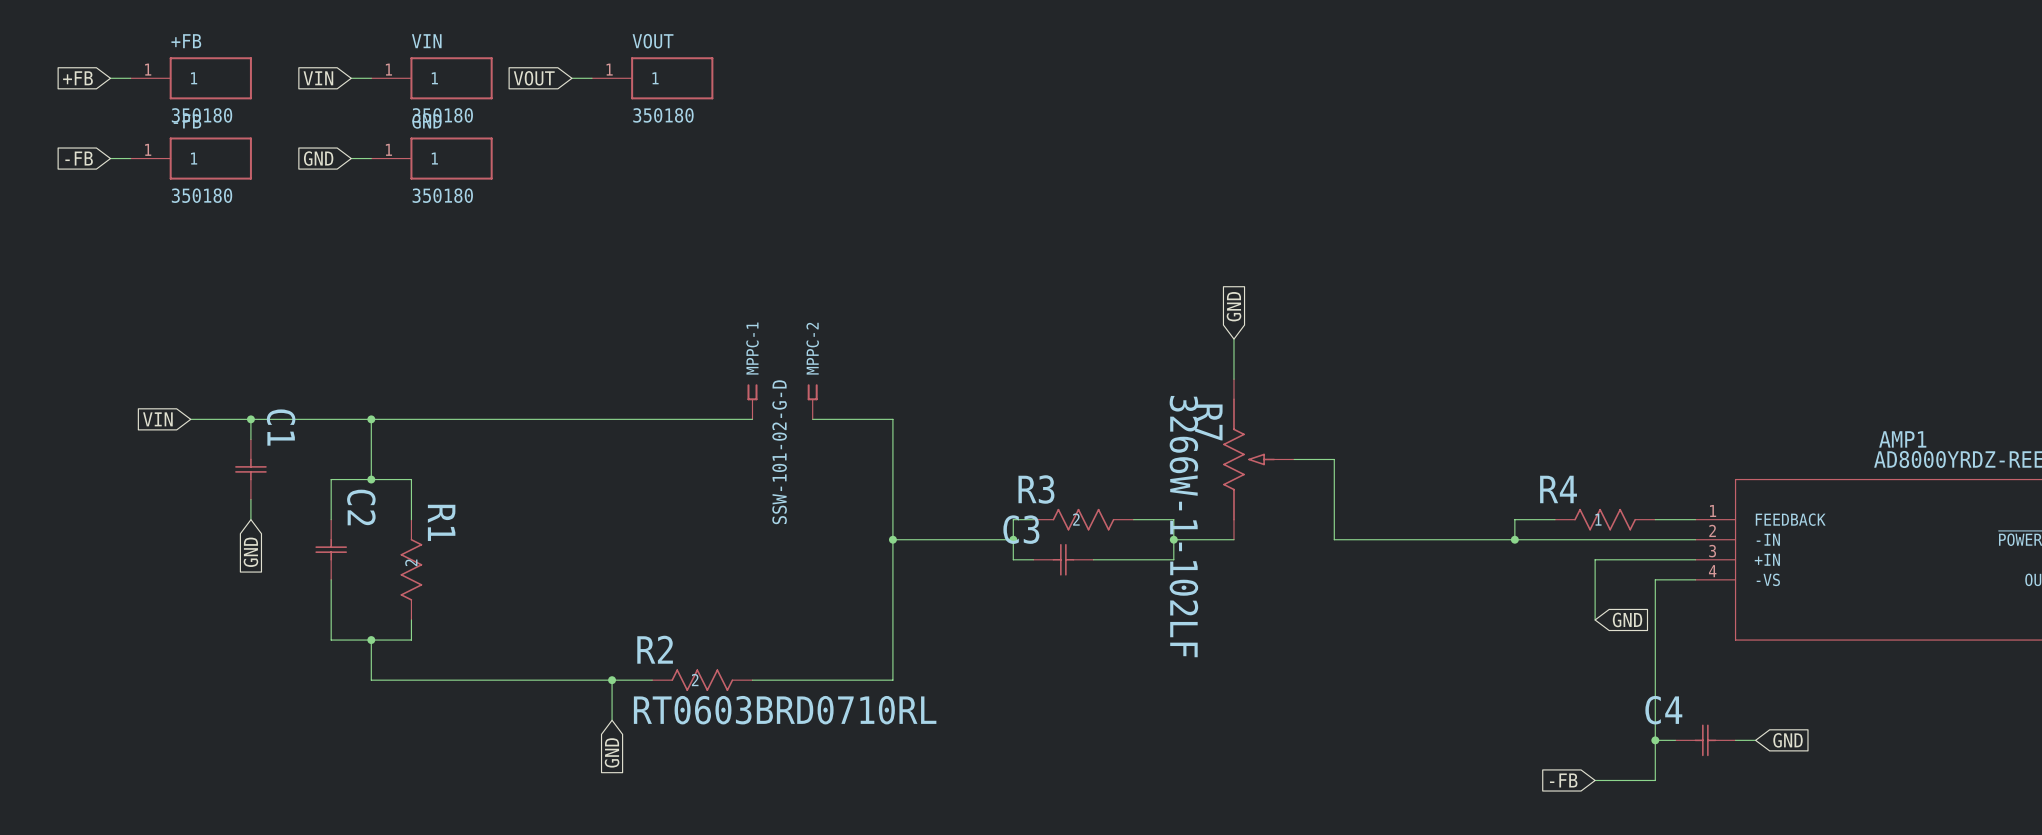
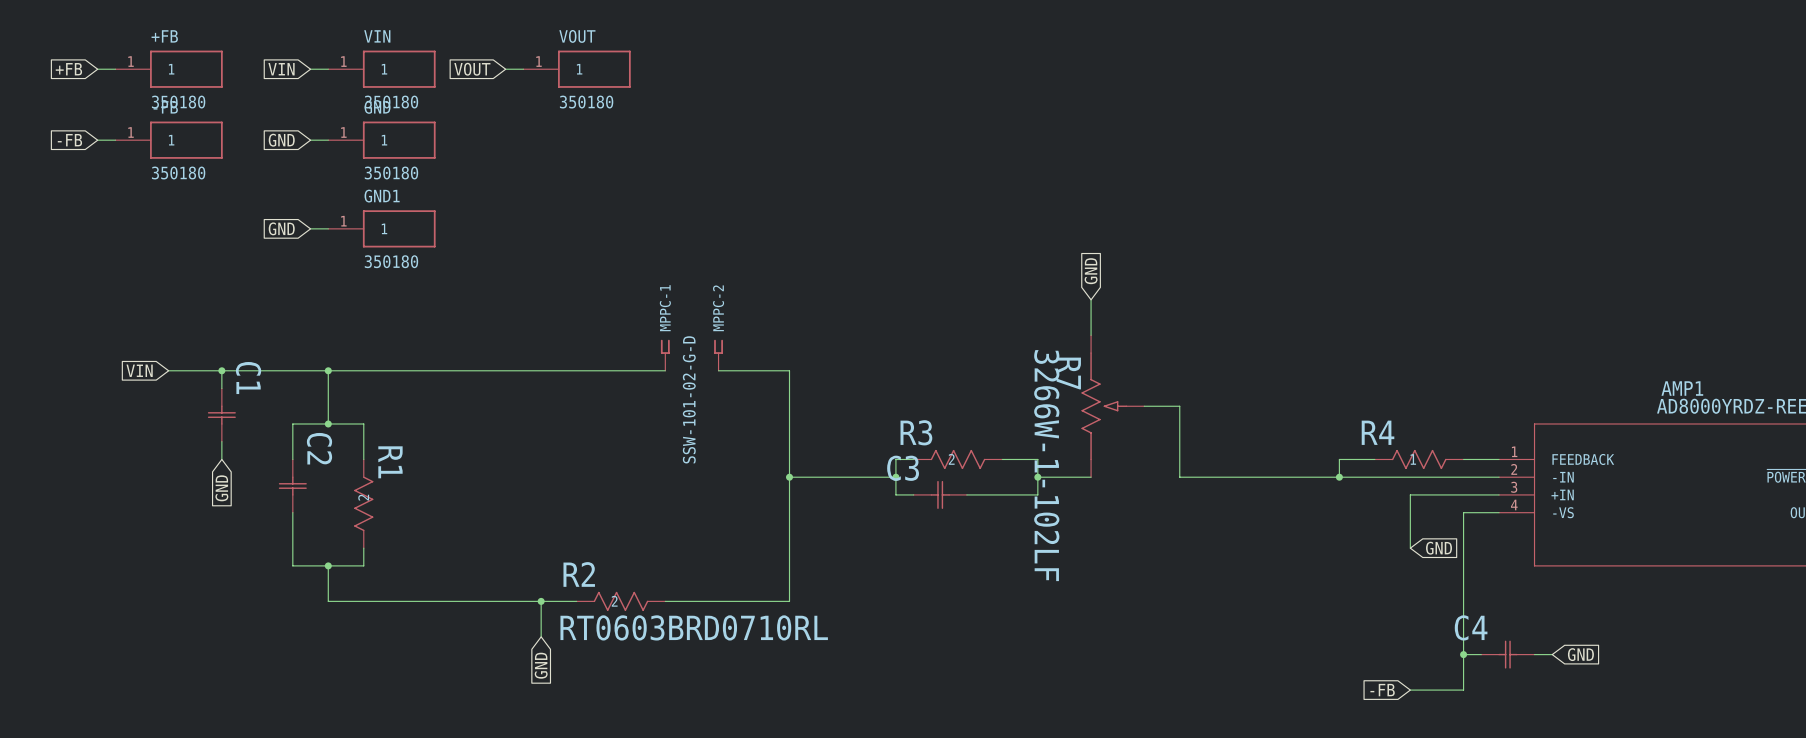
global label: none -> GND (281, 228)
wire: none -> (310, 228) (328, 228)
GND1: none -> 350180 (381, 228)

